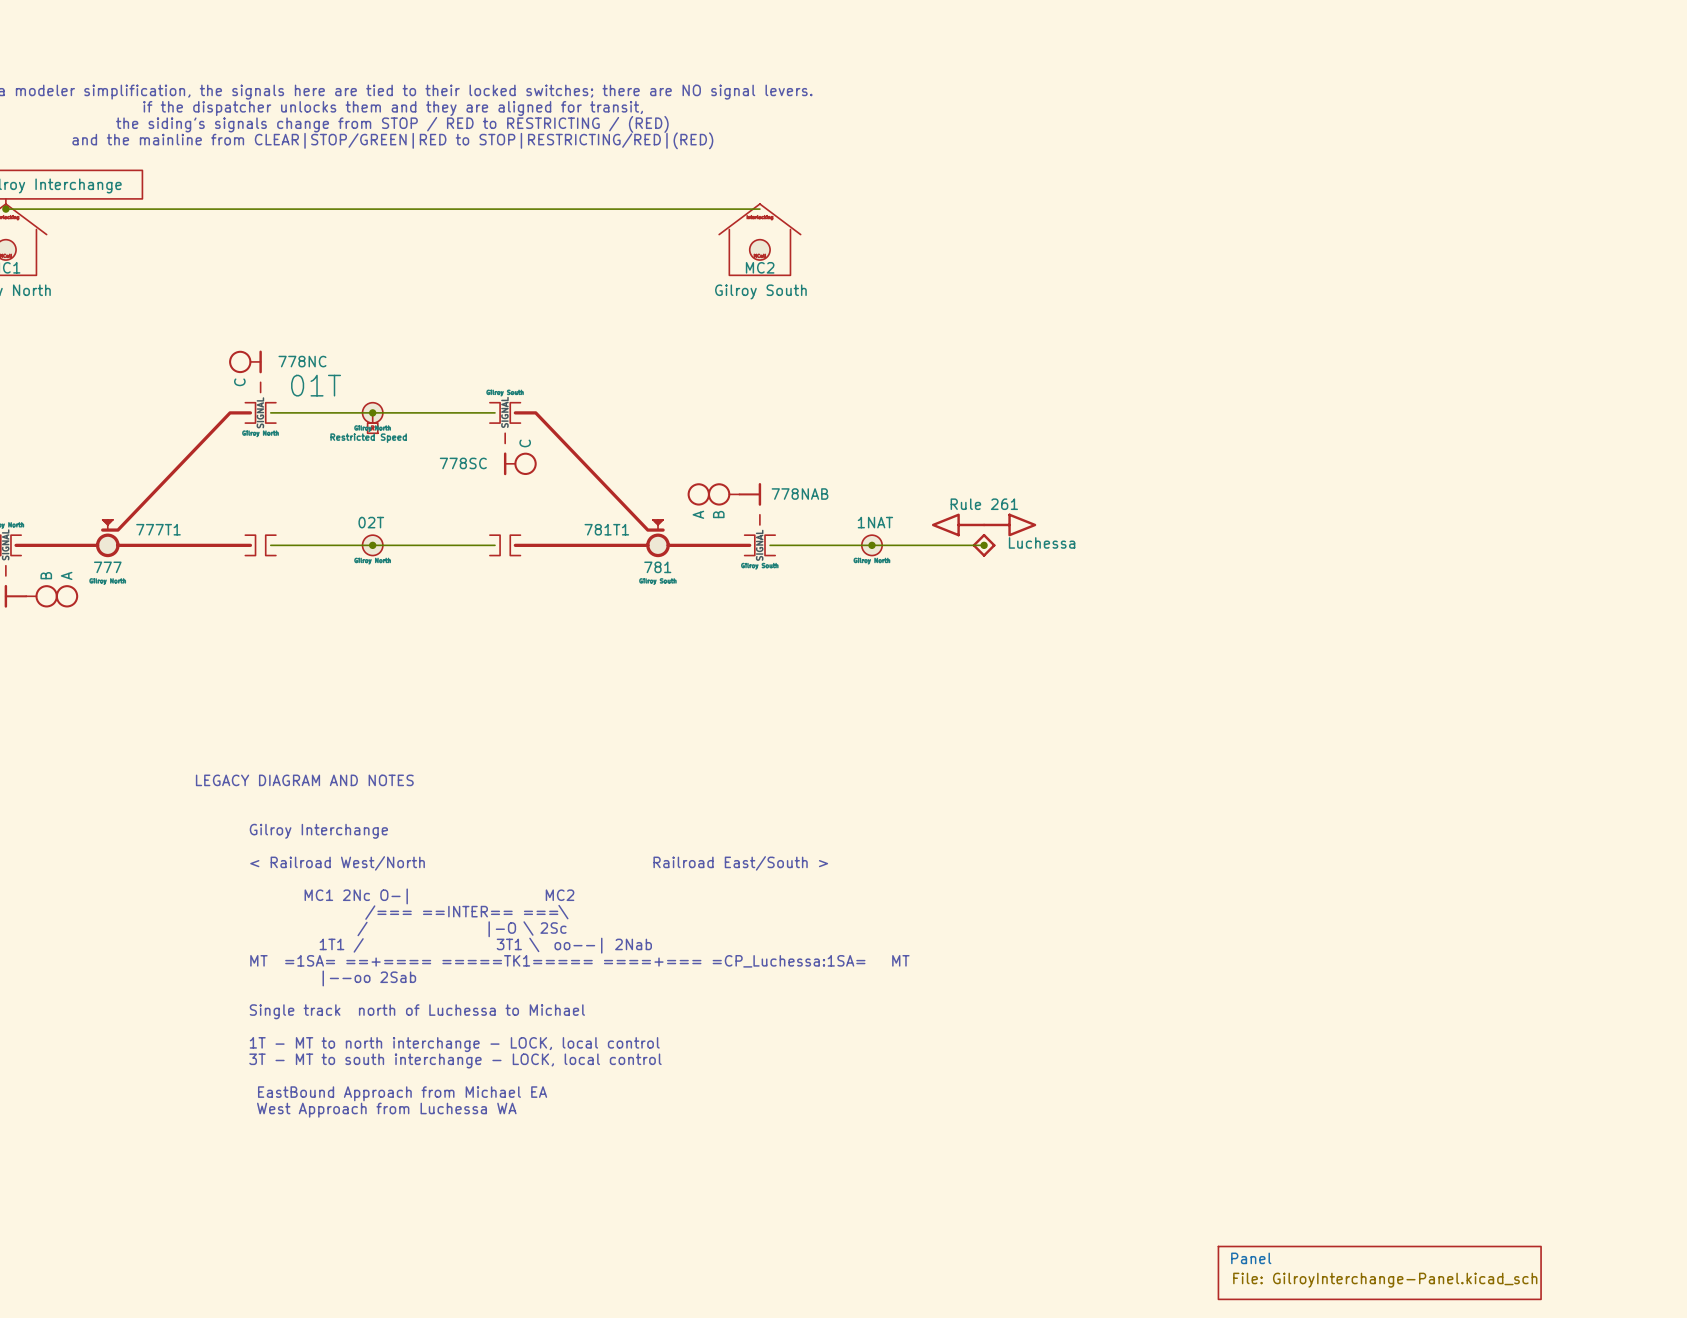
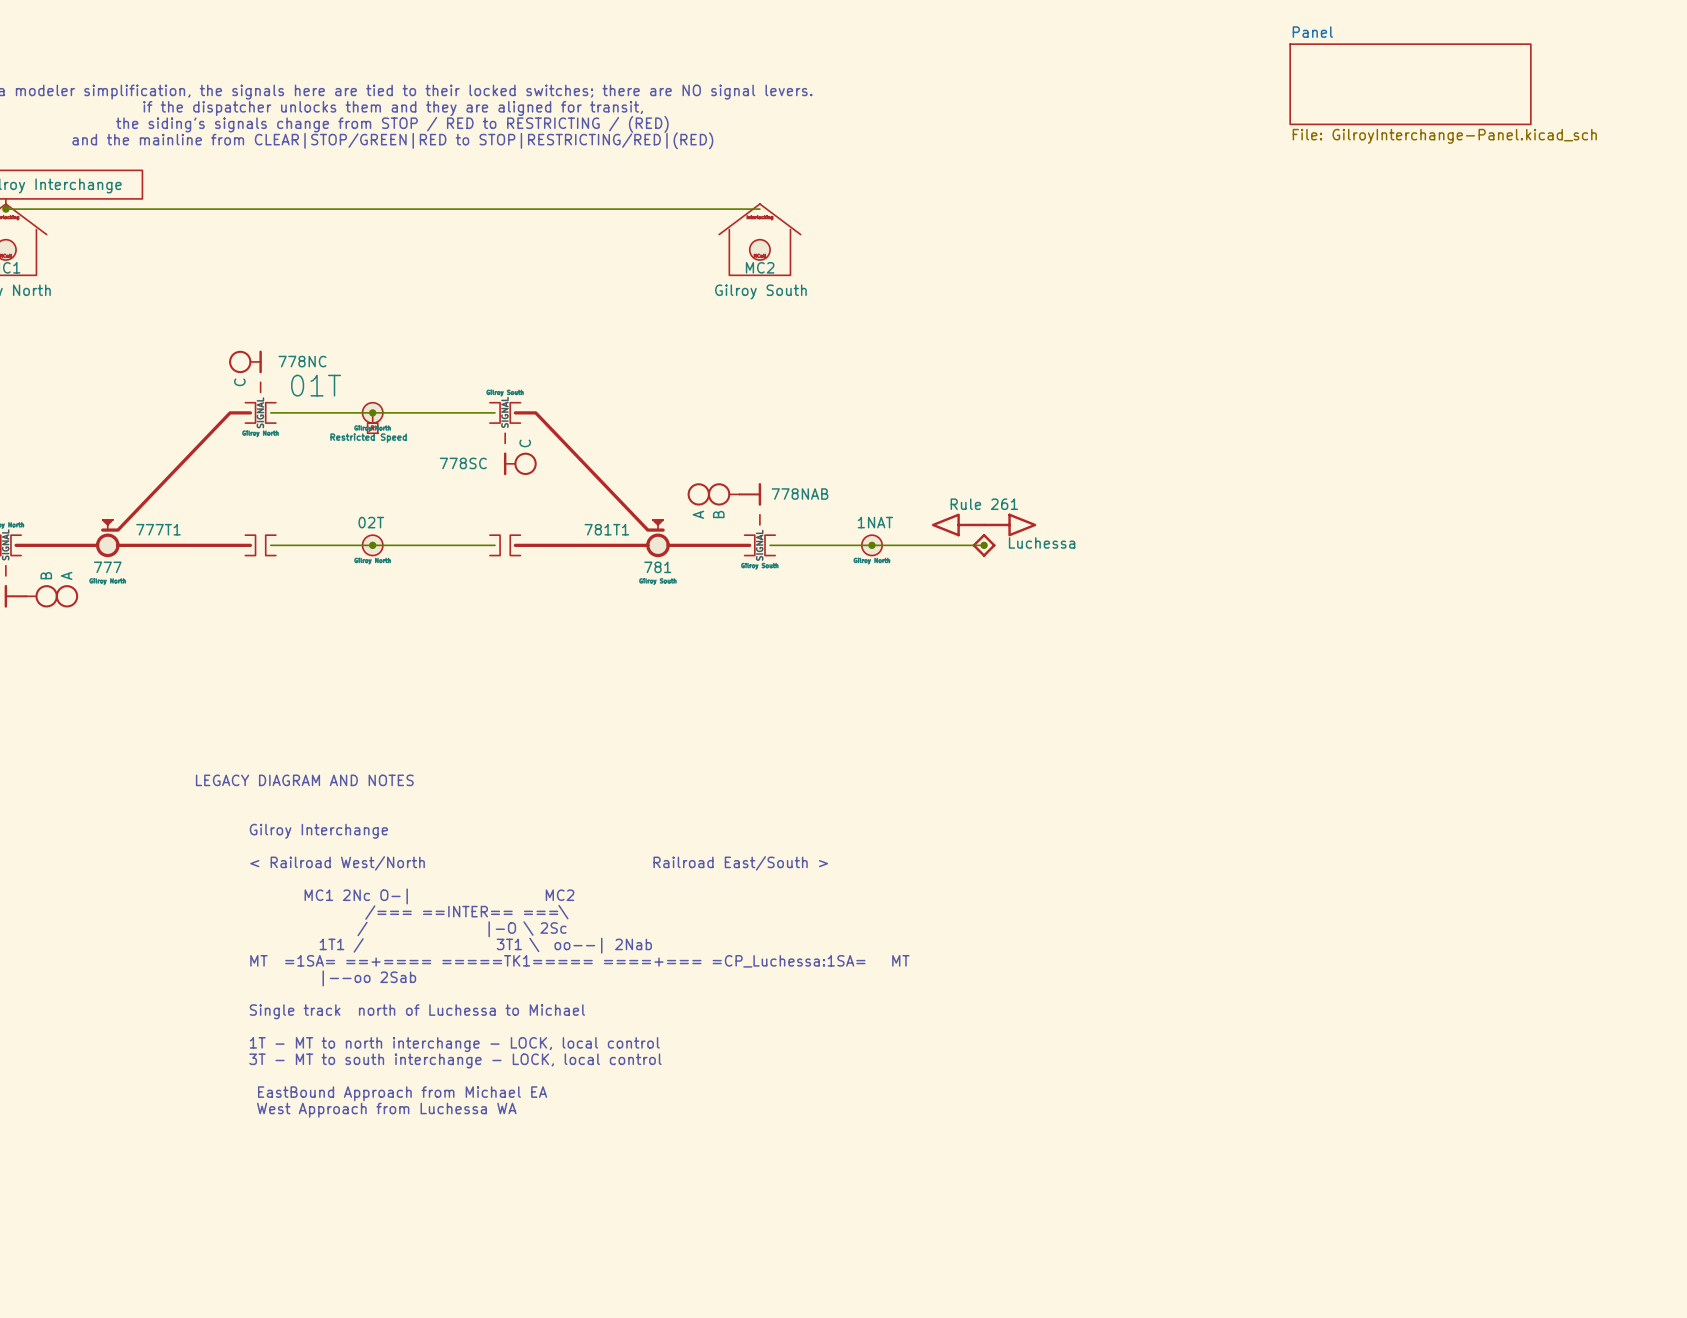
sheet Panel: none -> File: GilroyInterchange-Panel.kicad_sch (1410, 84)
sheet Panel: File: GilroyInterchange-Panel.kicad_sch (1379, 1272) -> none

